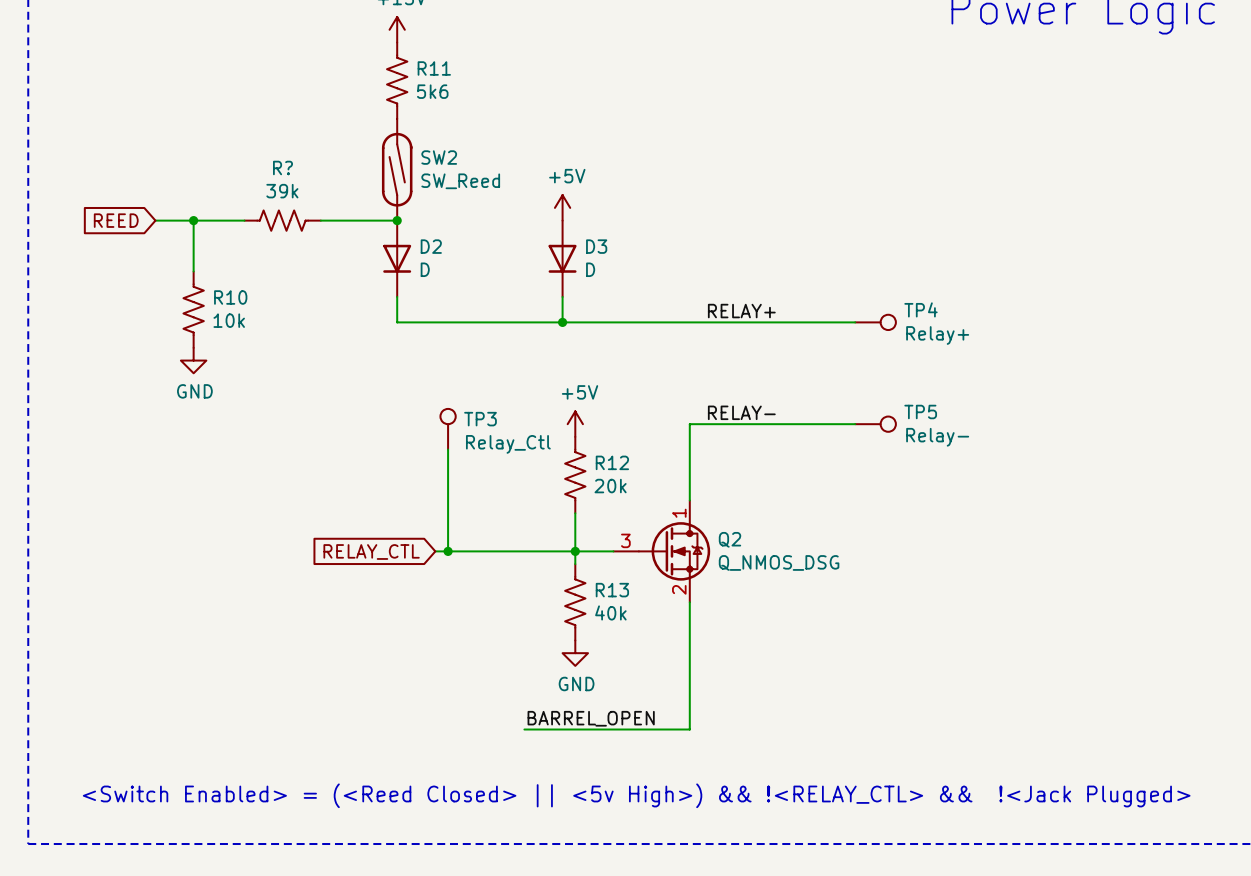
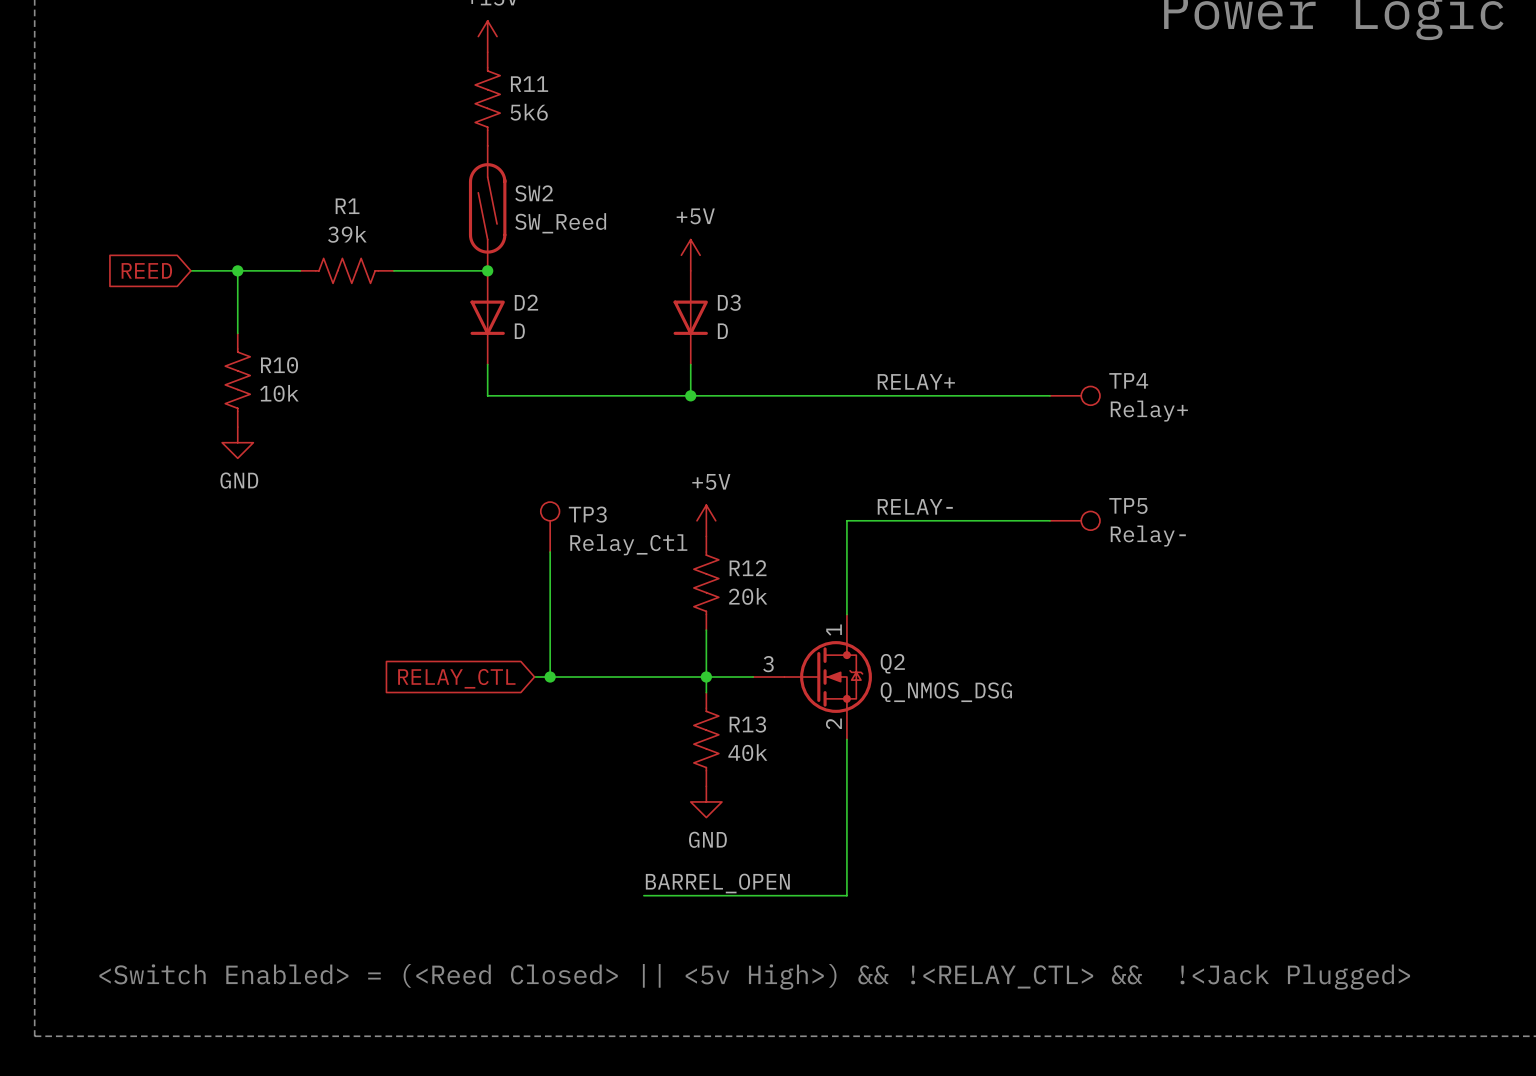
R? name: R? (282, 167) -> R1 (347, 206)

